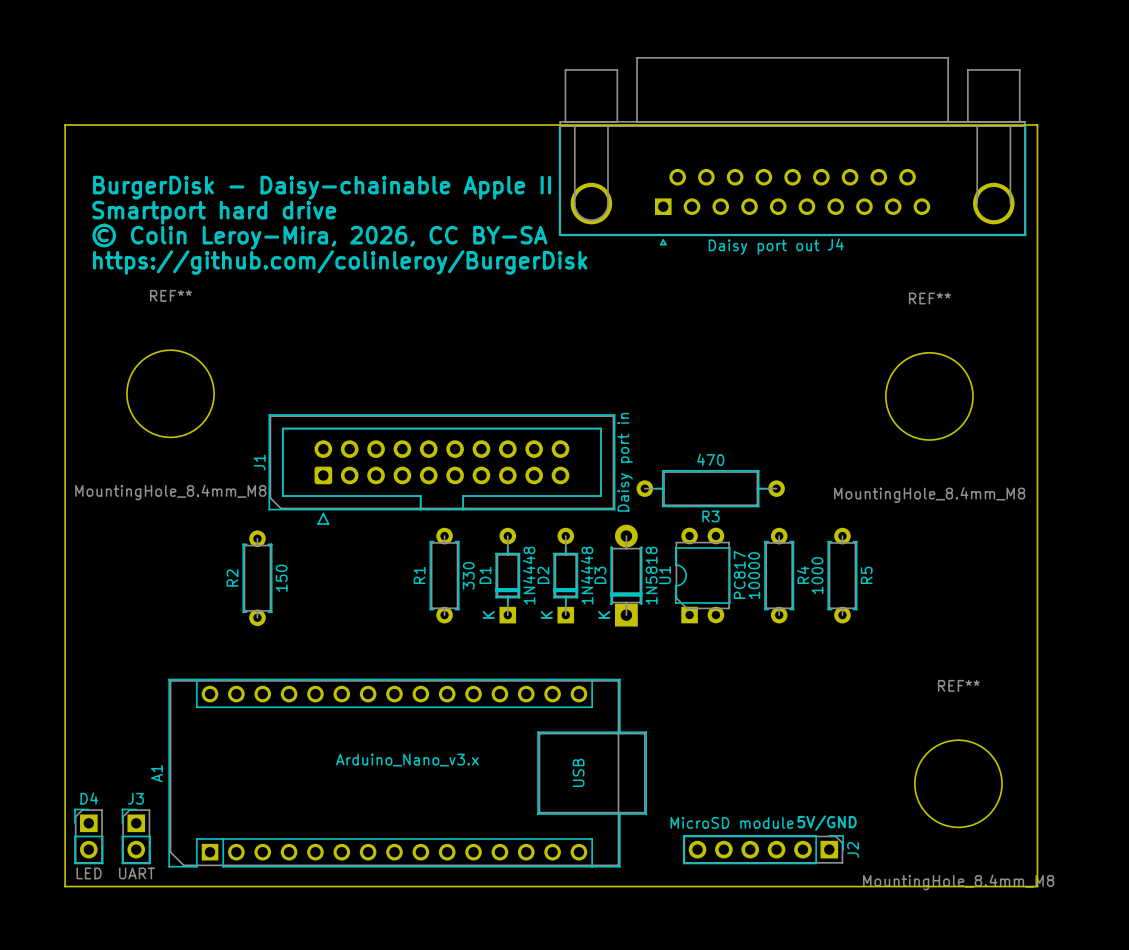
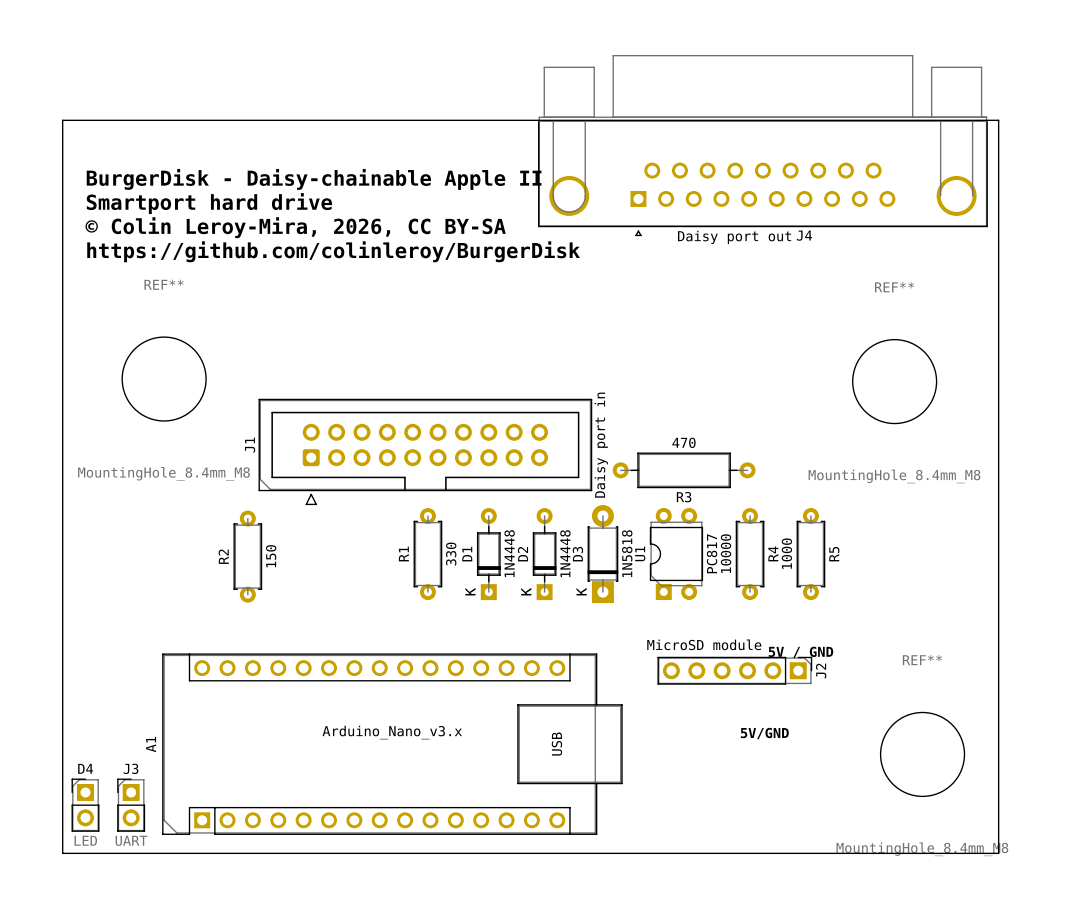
text: none -> 5V / GND (800, 652)
text position: 5V/GND (827, 823) -> 5V/GND (764, 733)
J2 position: (763, 849) -> (734, 670)

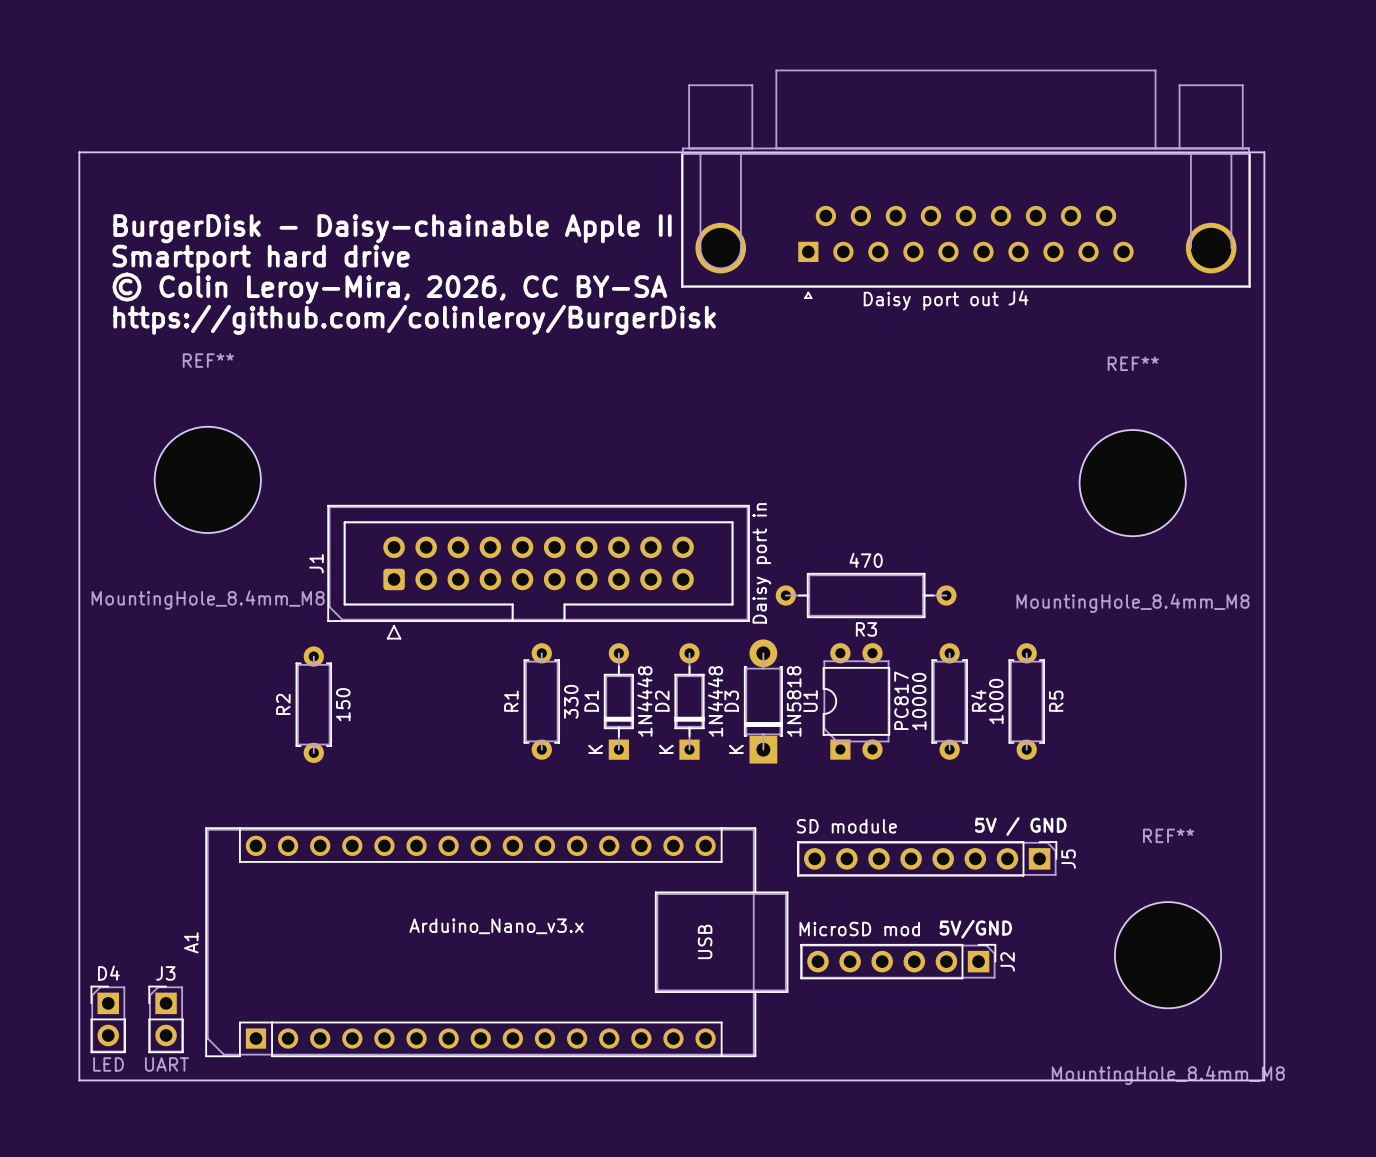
J2 value: MicroSD module (704, 644) -> MicroSD mod (859, 929)
J2 position: (734, 670) -> (898, 961)
J5: none -> SD module (927, 858)

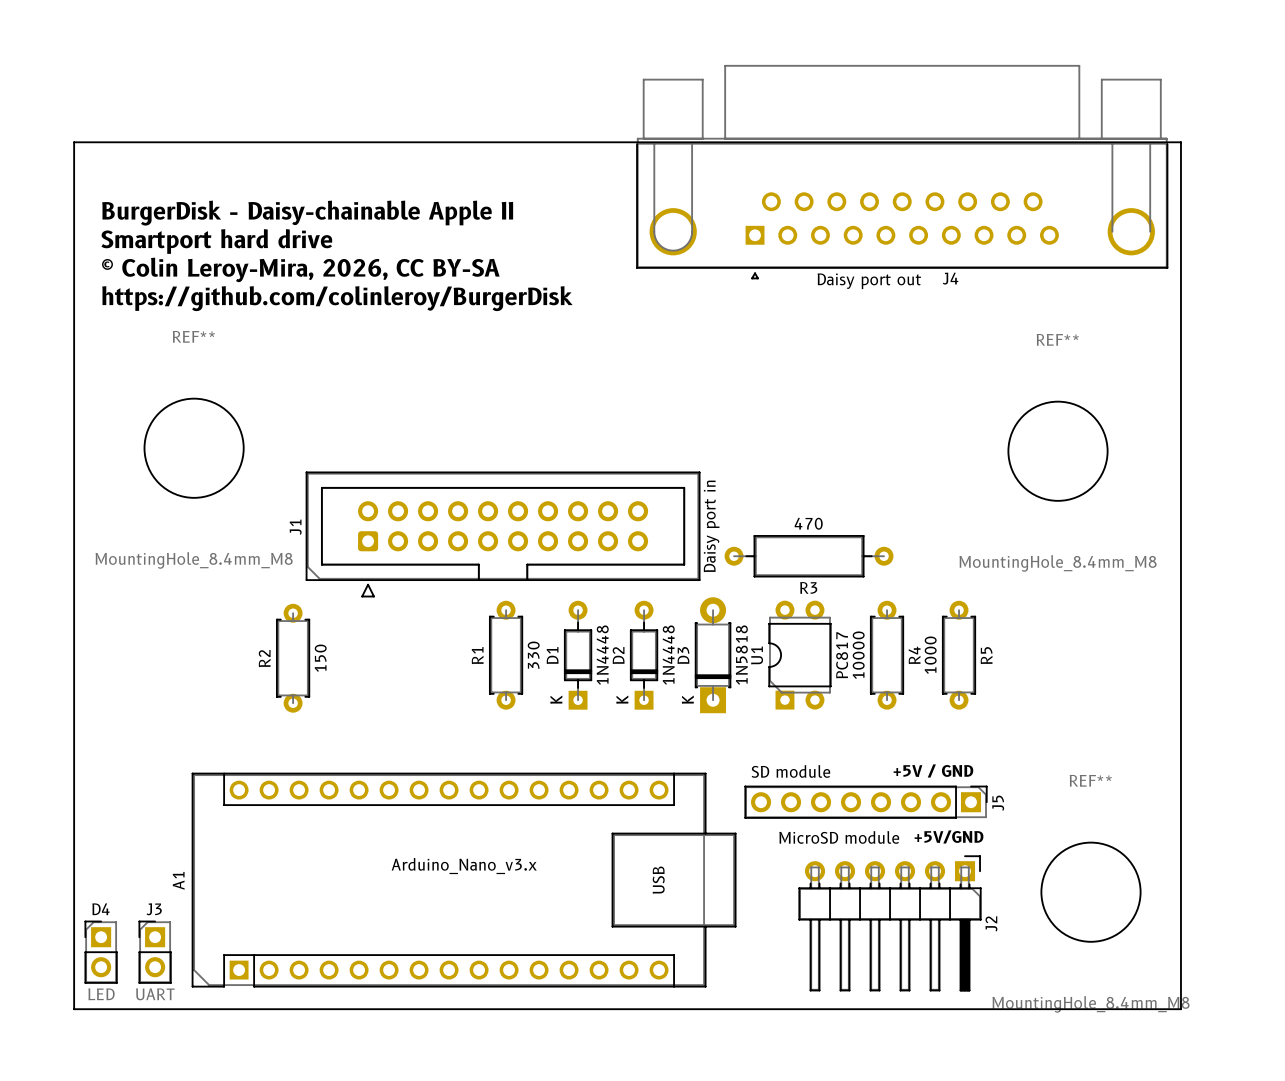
text: 5V / GND (1020, 826) -> +5V / GND (933, 770)
text: none -> +5V/GND (949, 836)
J2 value: MicroSD mod (859, 929) -> MicroSD module (839, 837)
text: 5V/GND (975, 929) -> none
J2 footprint: [800, 944, 997, 980] -> [798, 855, 982, 992]

